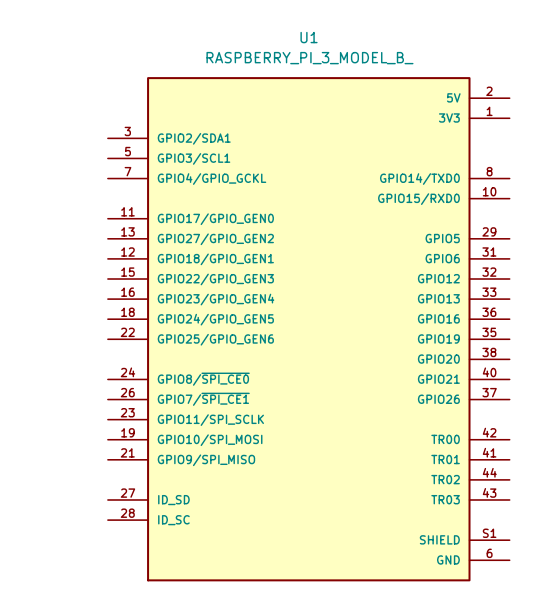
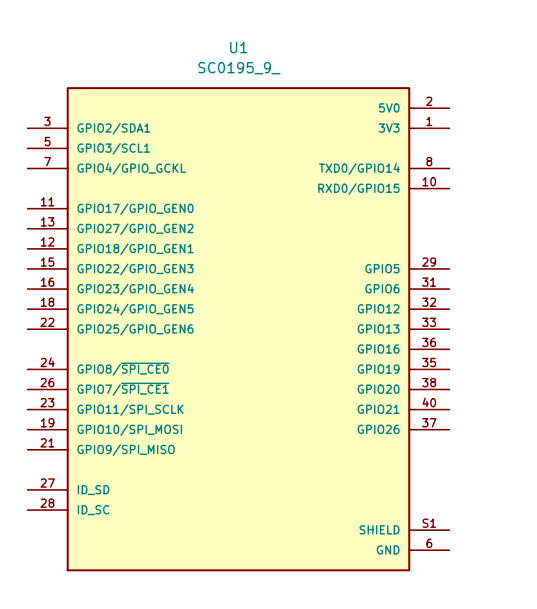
U1 value: RASPBERRY_PI_3_MODEL_B_ (309, 58) -> SC0195_9_ (239, 68)
U1 symbol: [107, 77, 510, 582] -> [27, 87, 450, 572]

